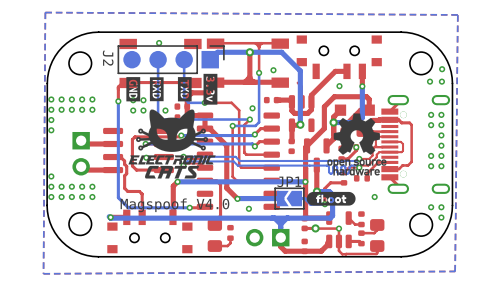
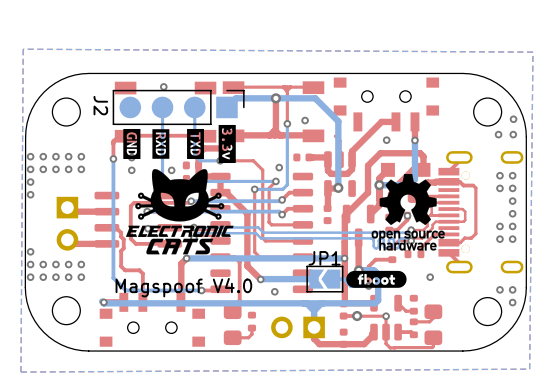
via: (143, 100) -> none
via: (143, 110) -> none

